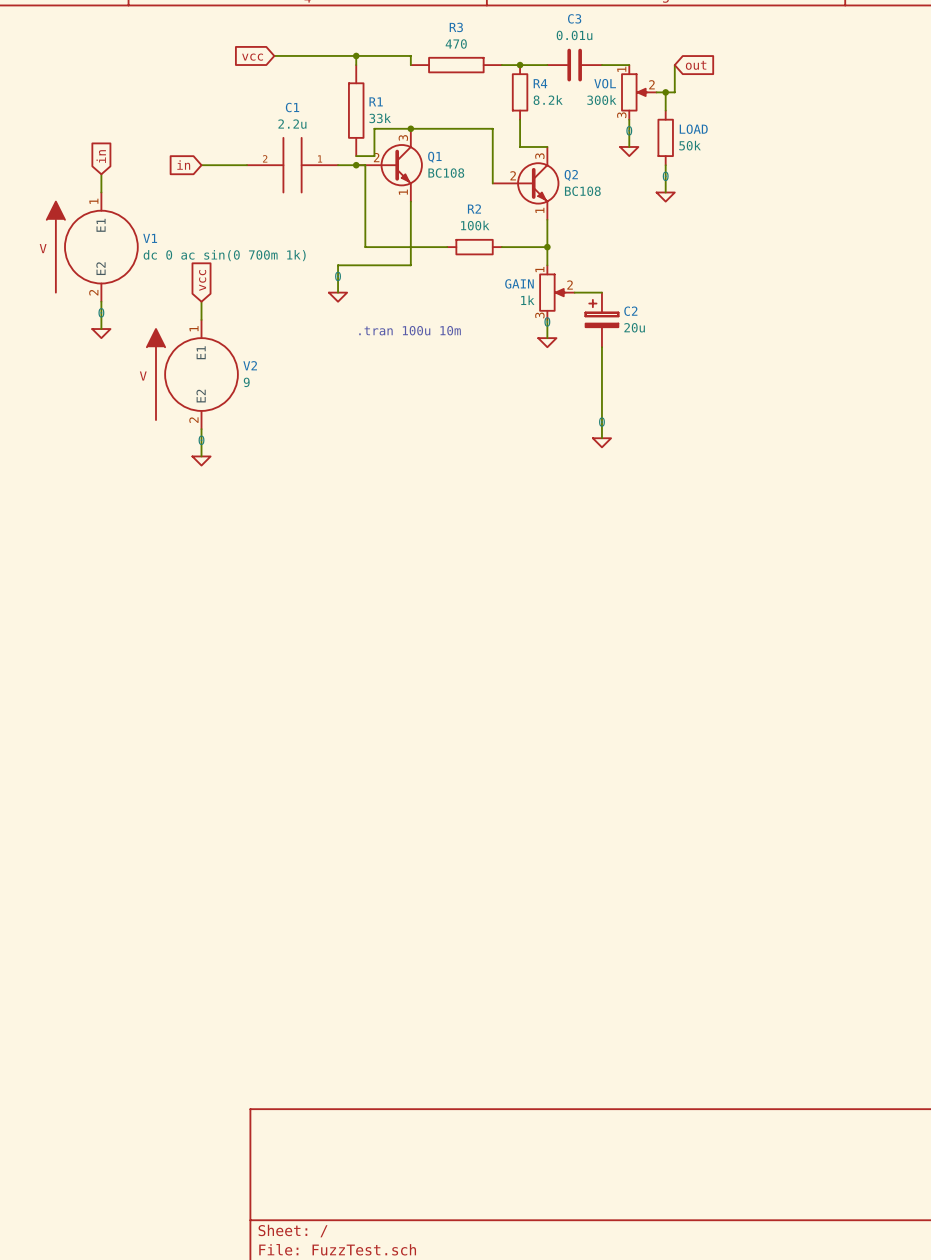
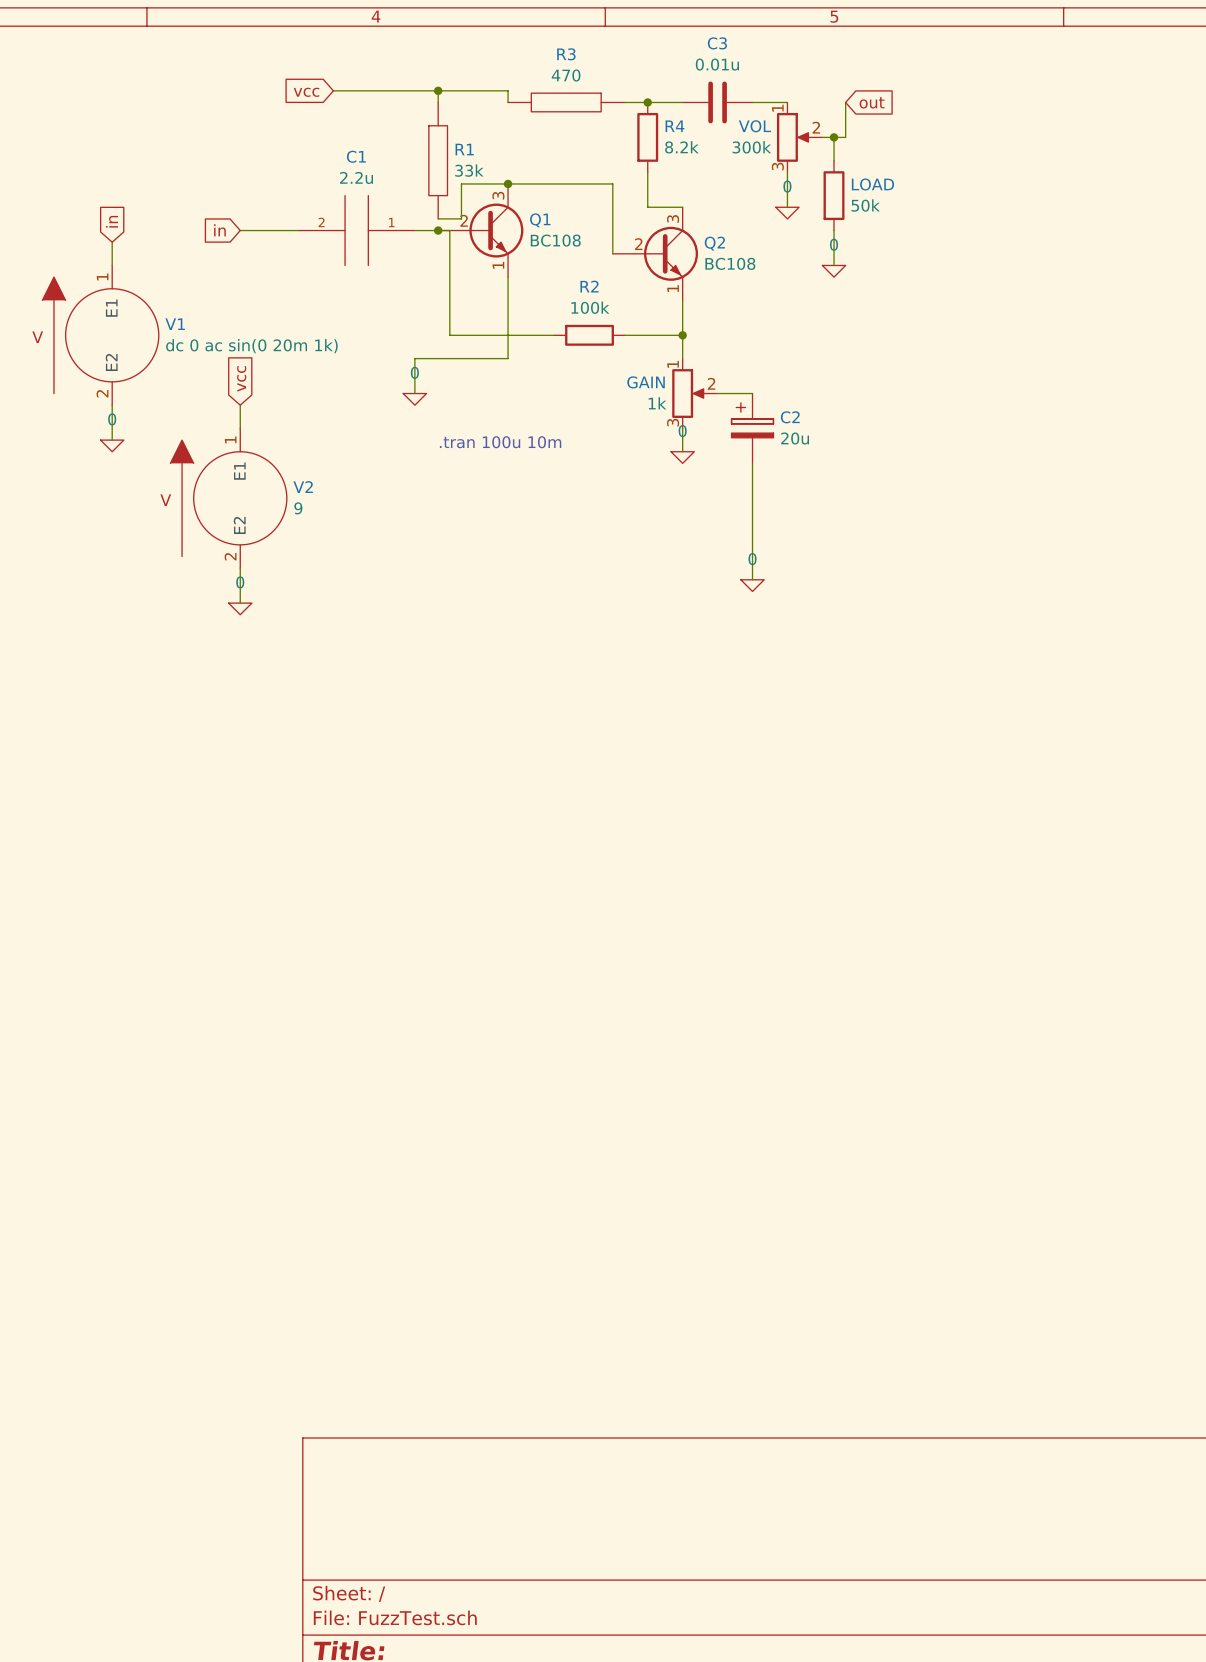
V1 value: dc 0 ac sin(0 700m 1k) (224, 255) -> dc 0 ac sin(0 20m 1k) (251, 346)

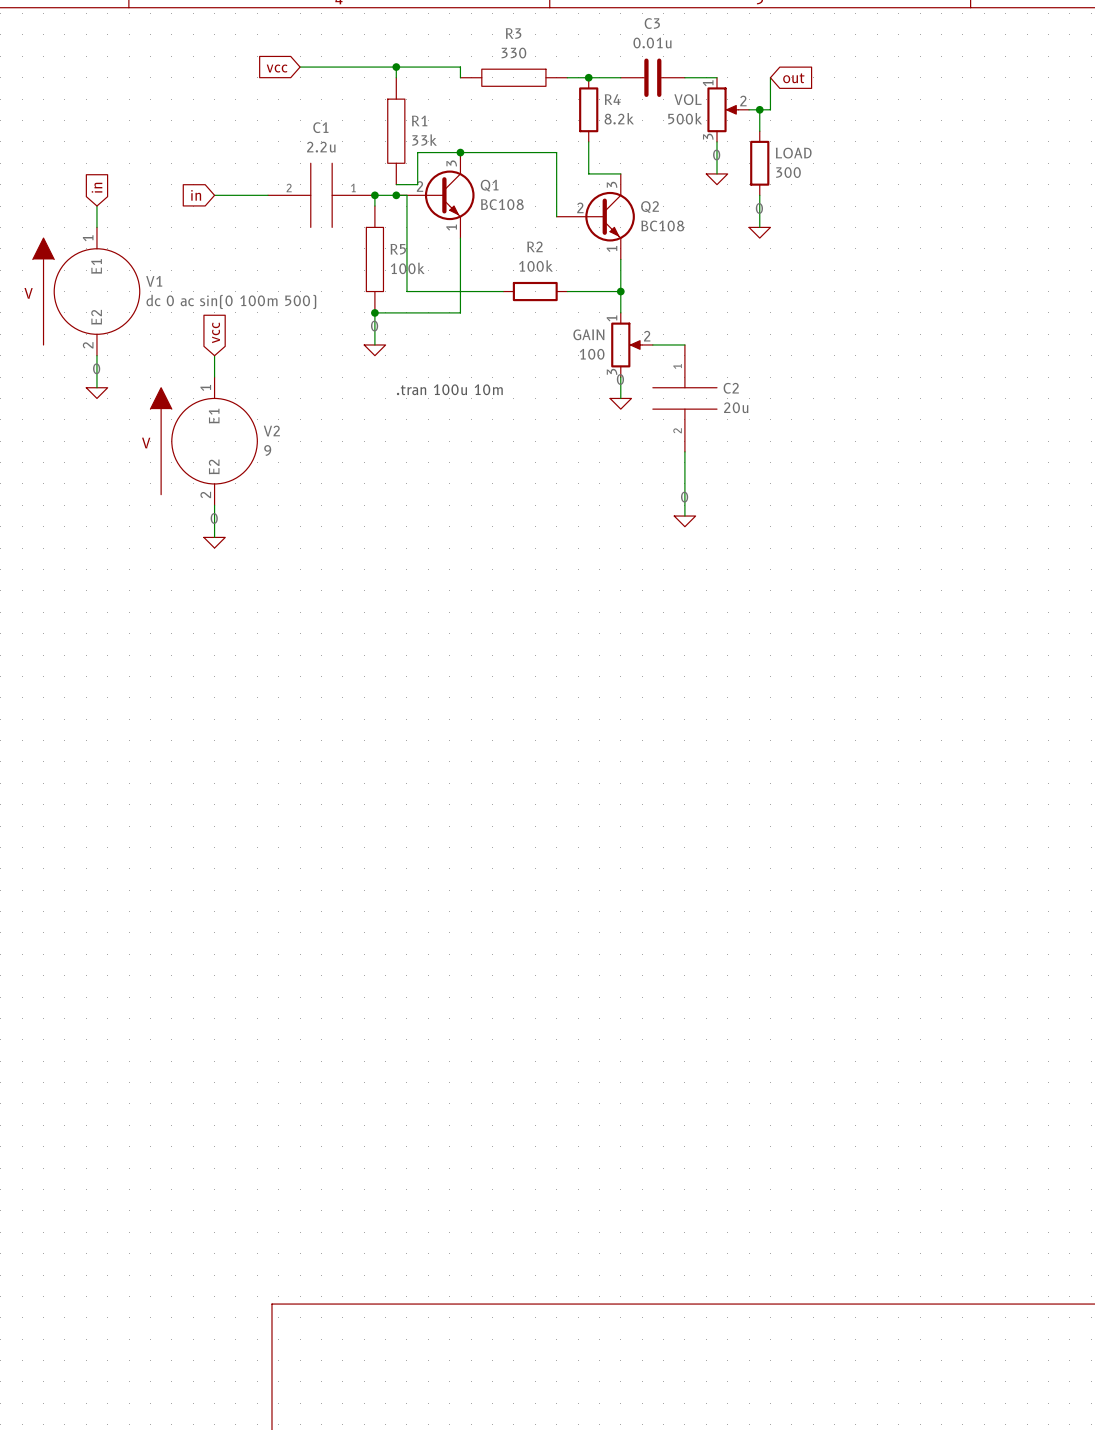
R3 value: 470 (566, 75) -> 330 (513, 53)
VOL value: 300k (751, 147) -> 500k (685, 118)
LOAD value: 50k (865, 205) -> 300 (788, 172)
wire: none -> (374, 195) (374, 206)
junction: none -> (374, 195)
R5: none -> 100k (374, 259)
V1 value: dc 0 ac sin(0 20m 1k) (251, 346) -> dc 0 ac sin(0 100m 500) (231, 301)
junction: none -> (374, 312)
C2 symbol: [731, 393, 774, 464] -> [652, 344, 718, 452]
GAIN value: 1k (657, 403) -> 100 (592, 354)

